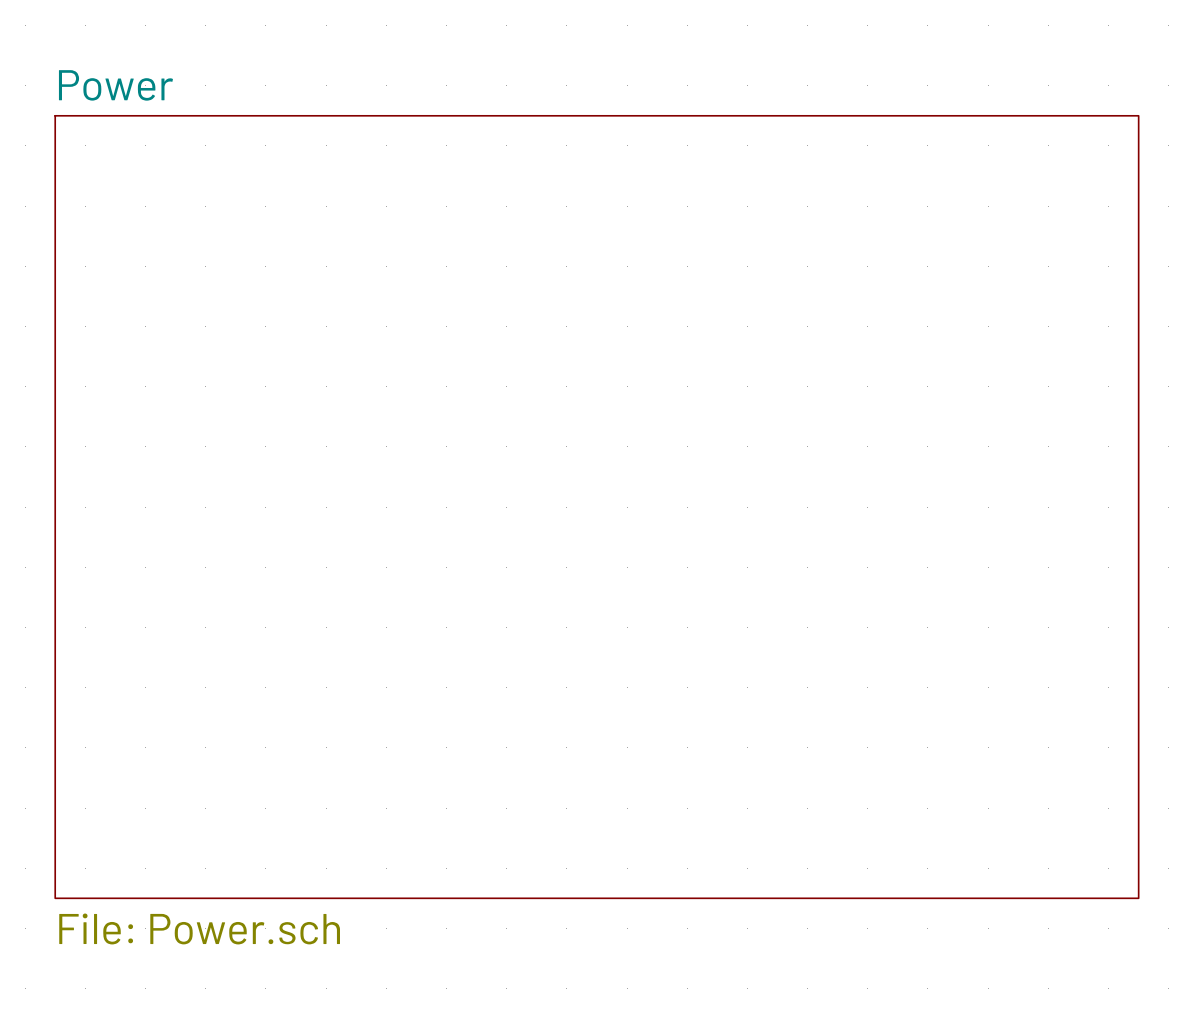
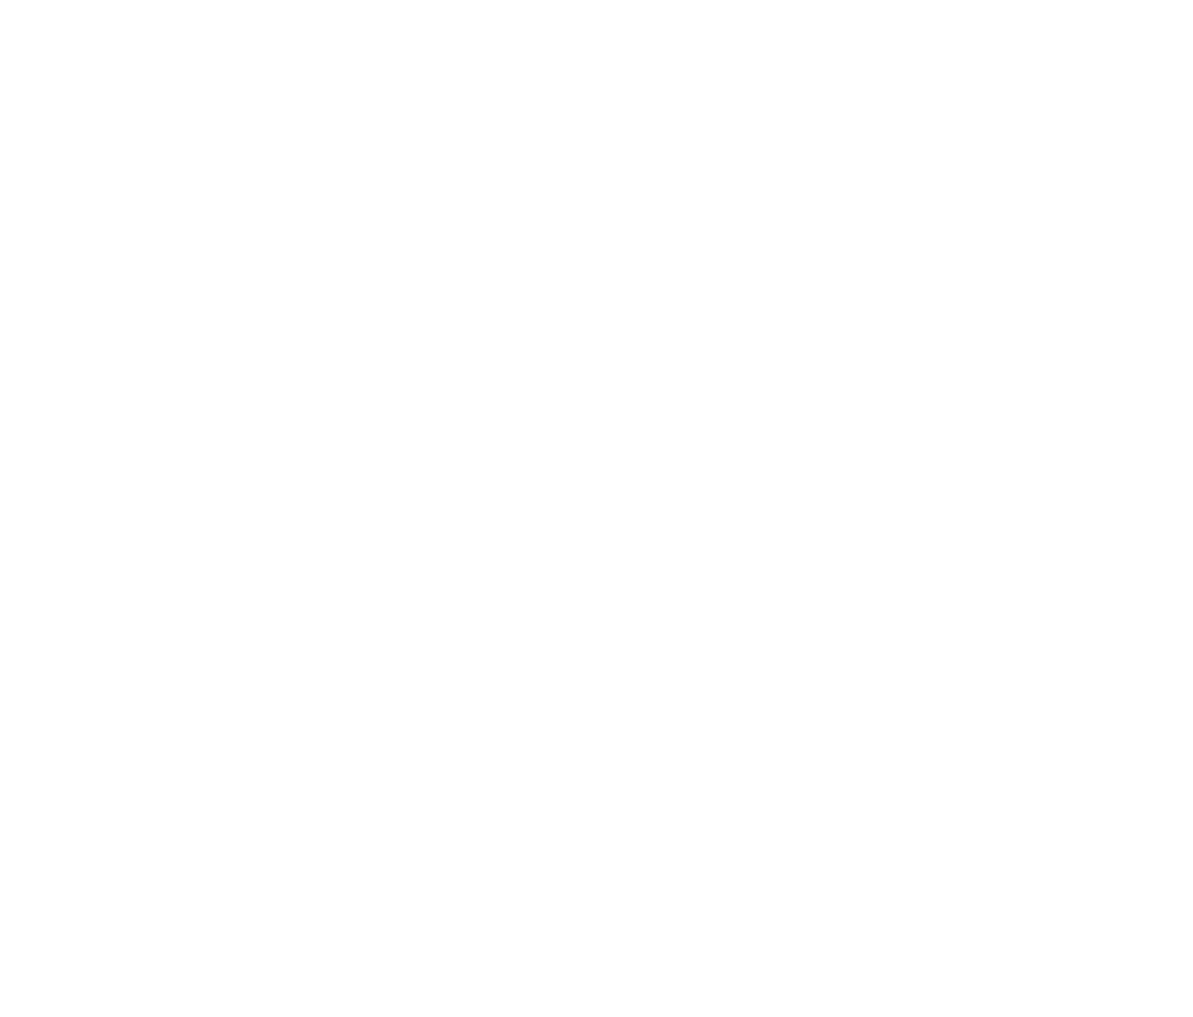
sheet Power: File: Power.sch (596, 507) -> none

